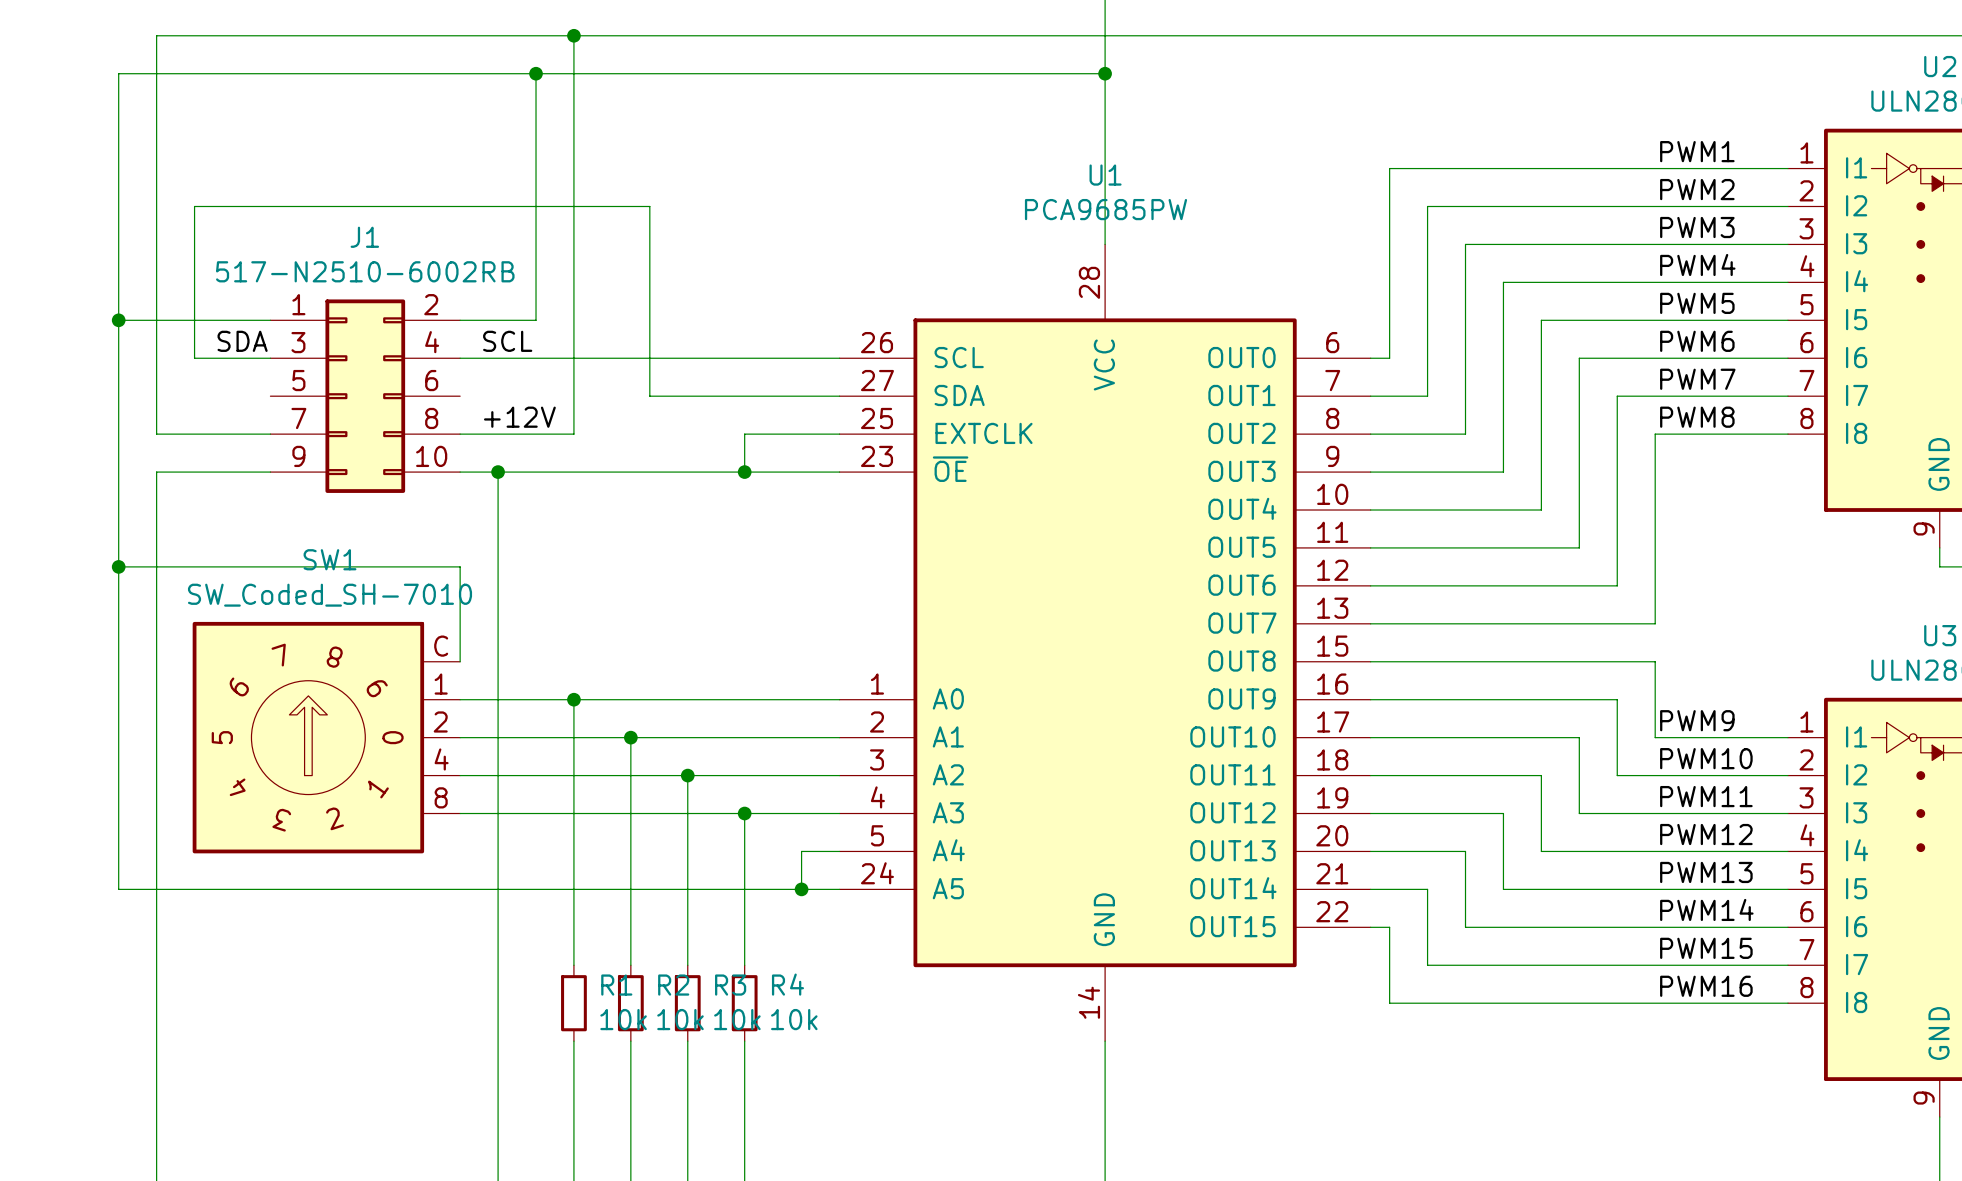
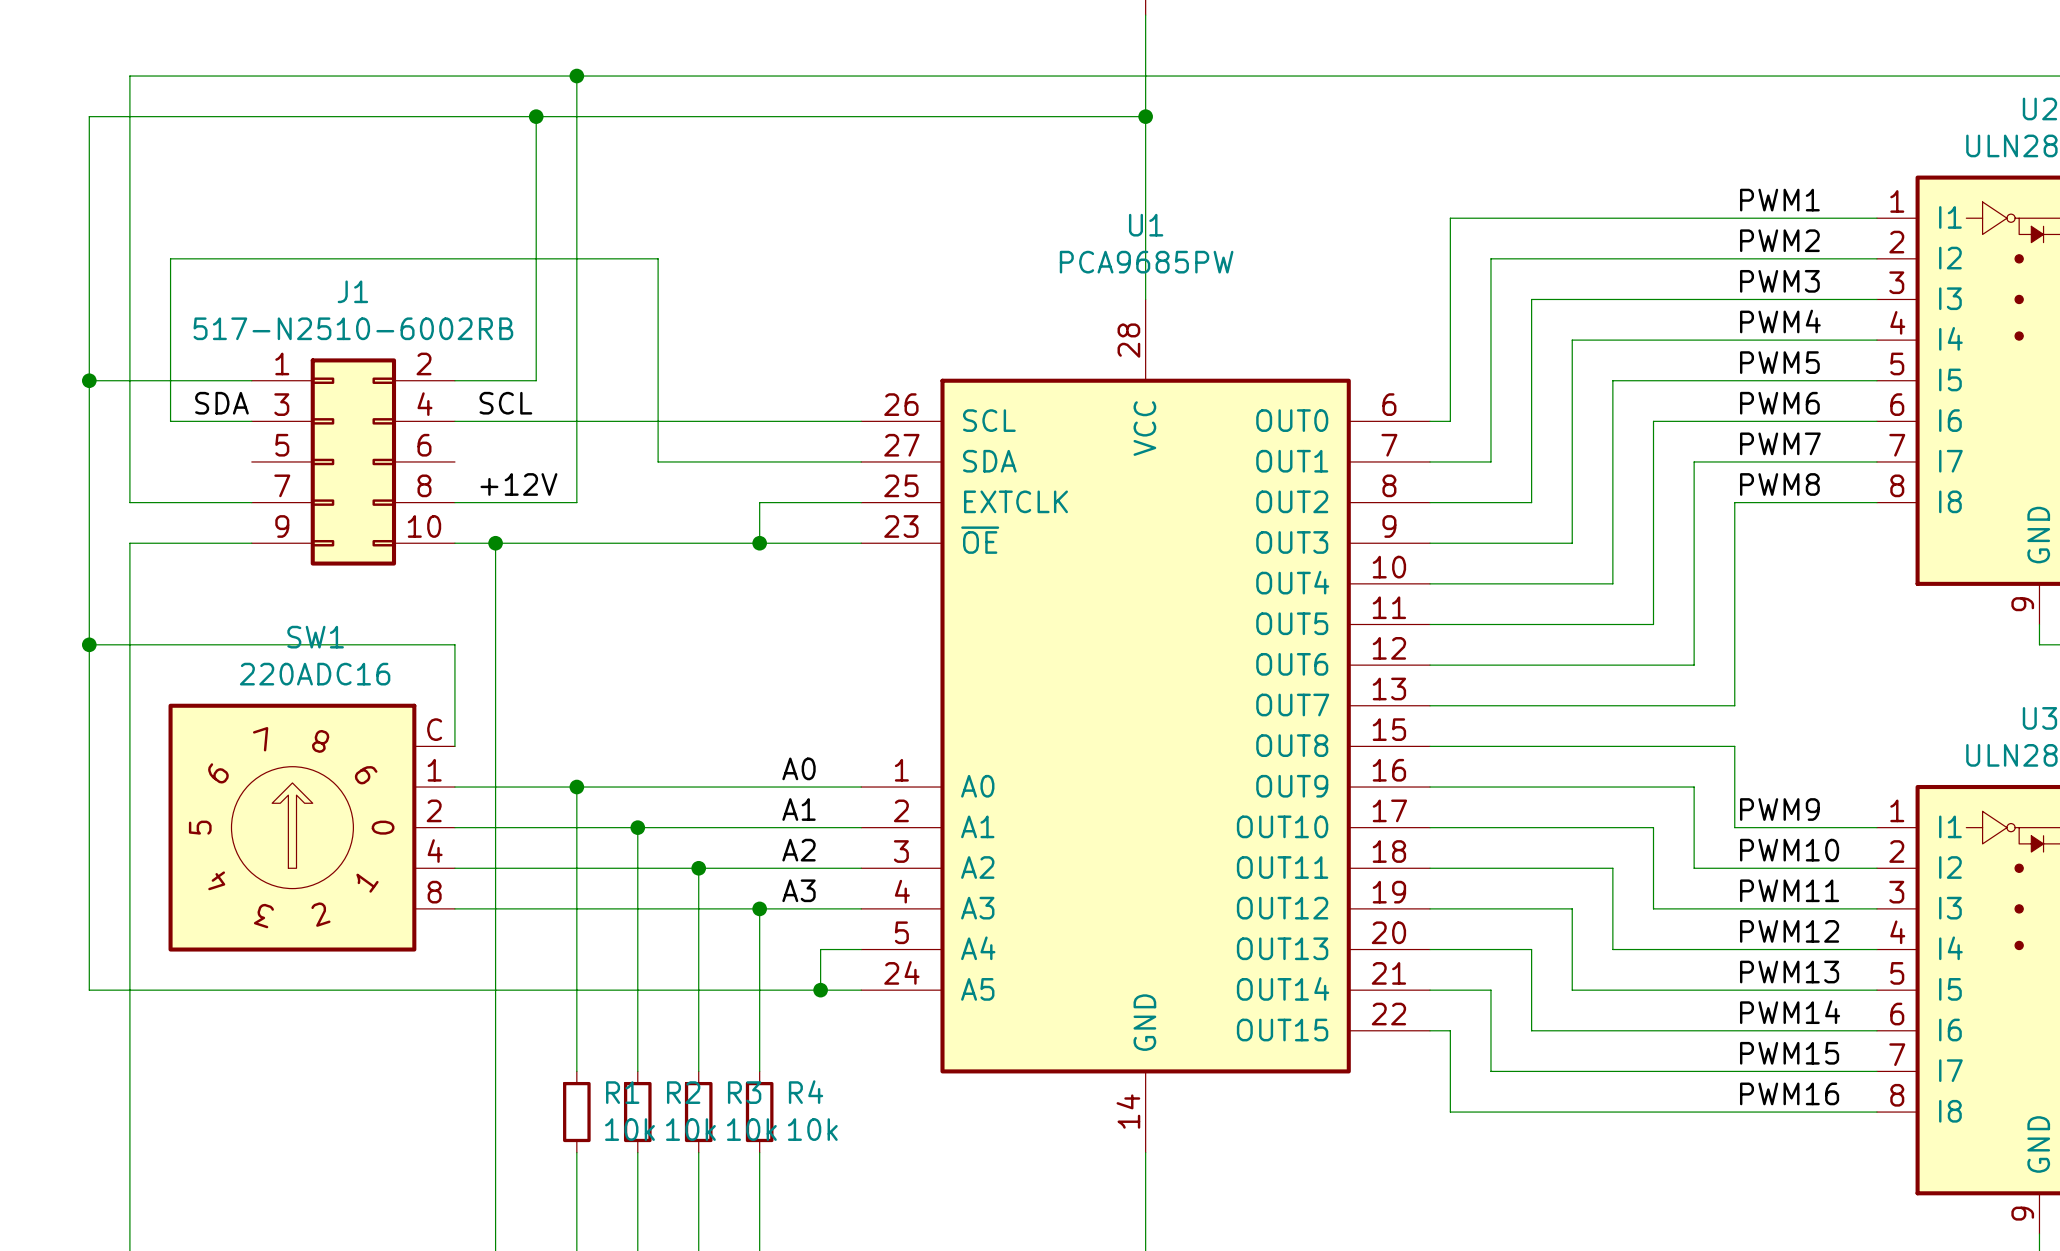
SW1 value: SW_Coded_SH-7010 (330, 595) -> 220ADC16 (315, 674)
label: none -> A0 (799, 768)
label: none -> A1 (799, 809)
label: none -> A2 (799, 850)
label: none -> A3 (799, 890)

